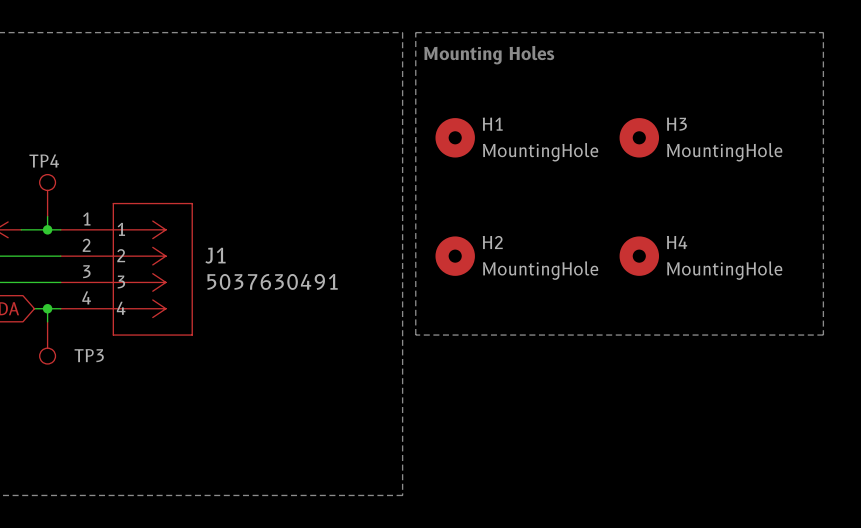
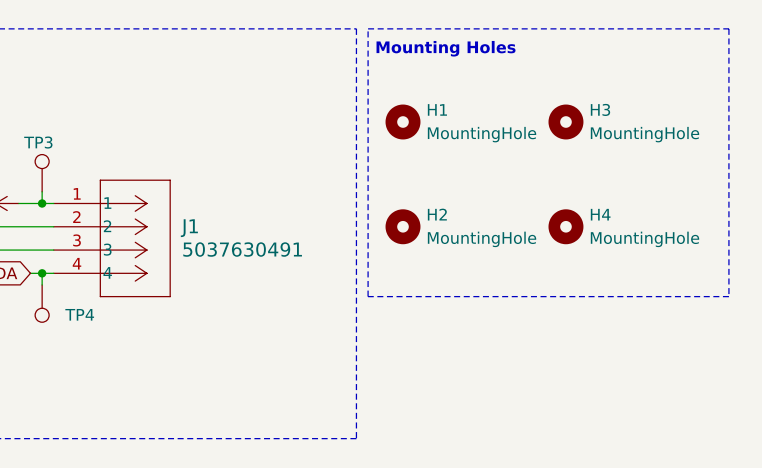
TP4 name: TP4 (44, 160) -> TP3 (38, 142)
TP3 name: TP3 (89, 355) -> TP4 (79, 314)

